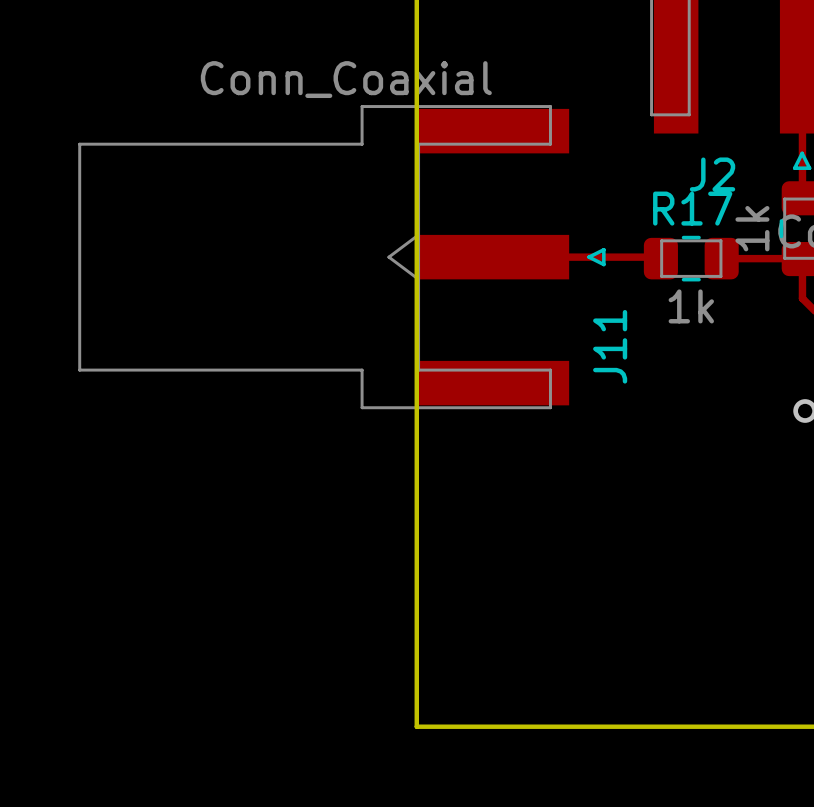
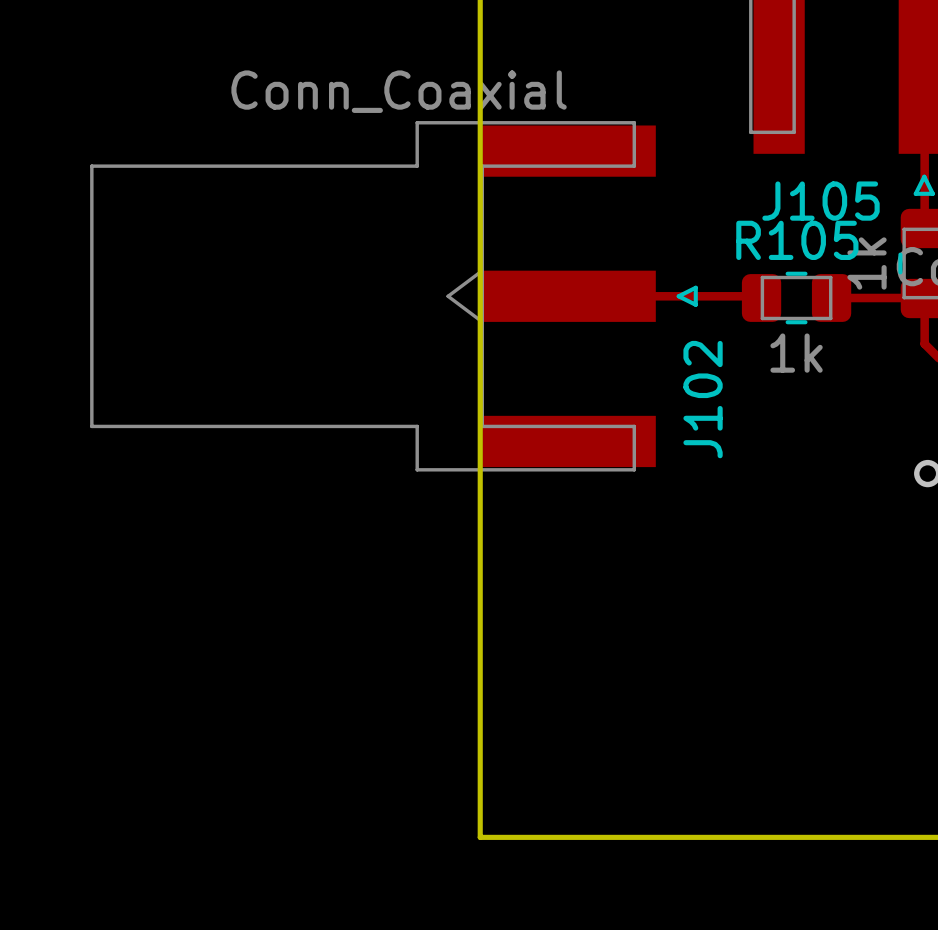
J2 name: J2 (712, 174) -> J105 (821, 201)
R17 name: R17 (692, 208) -> R105 (797, 240)
J11 name: J11 (610, 346) -> J102 (703, 399)

